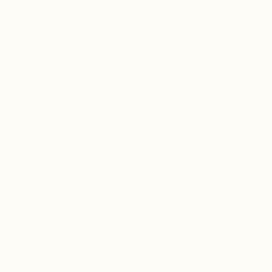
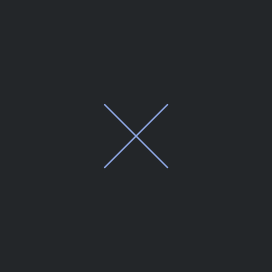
no-connect mark: none -> (136, 136)

